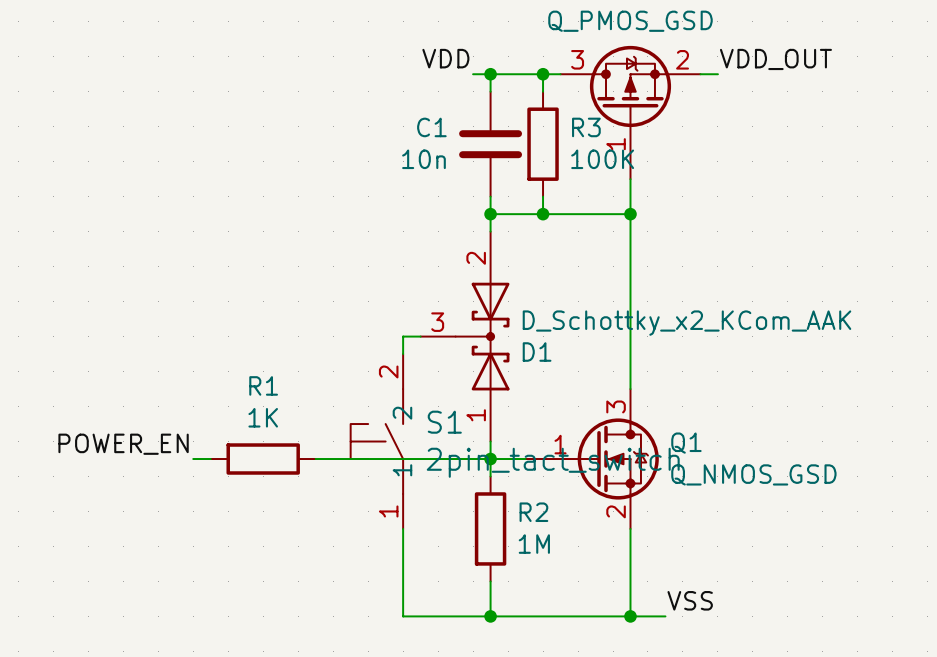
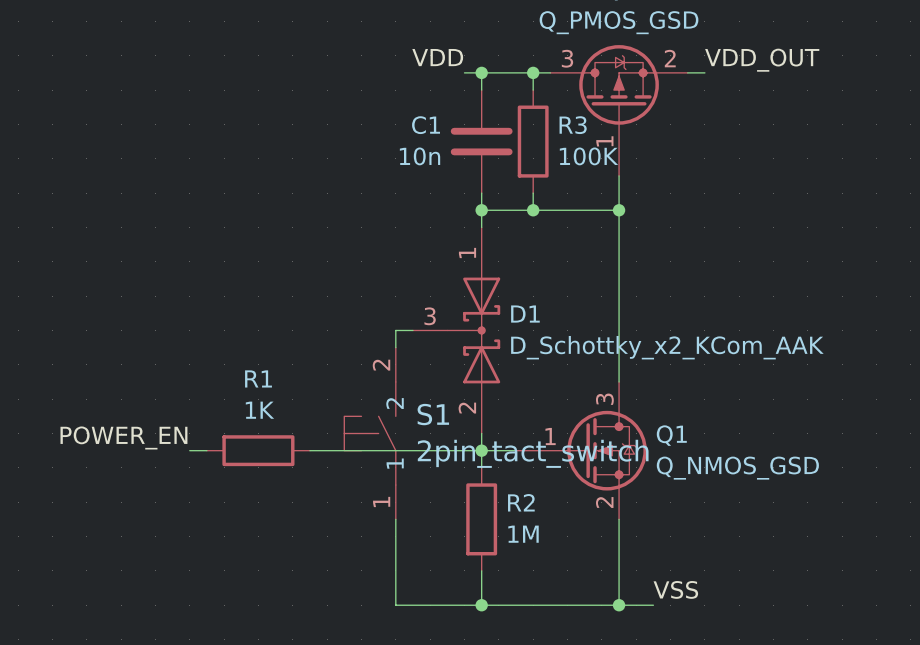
D1 flip: as is (482, 336) -> up-down (473, 330)

